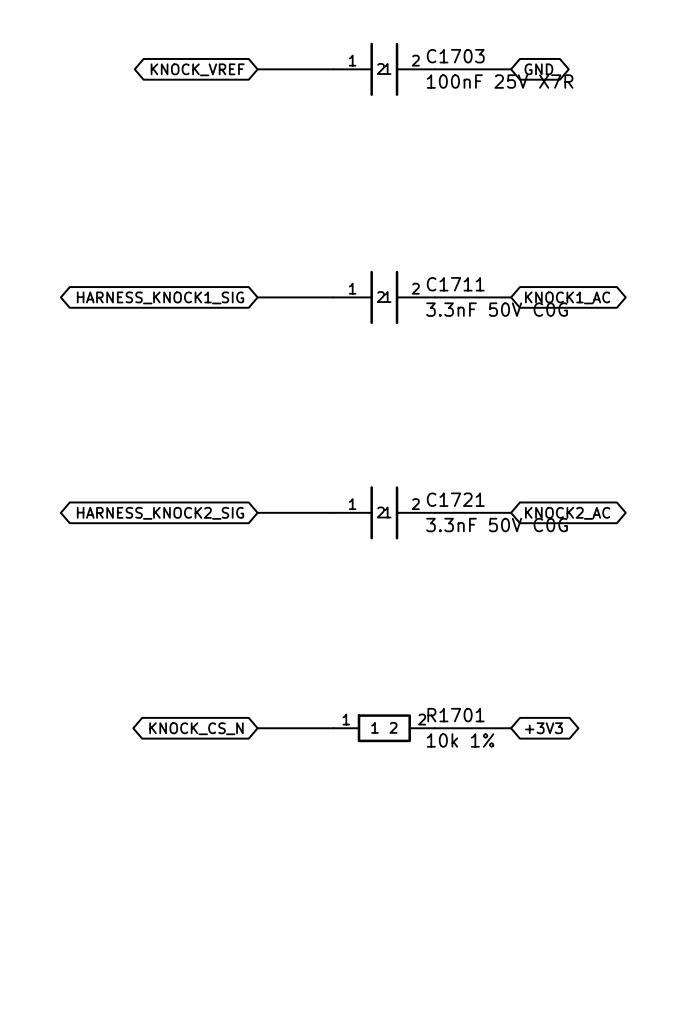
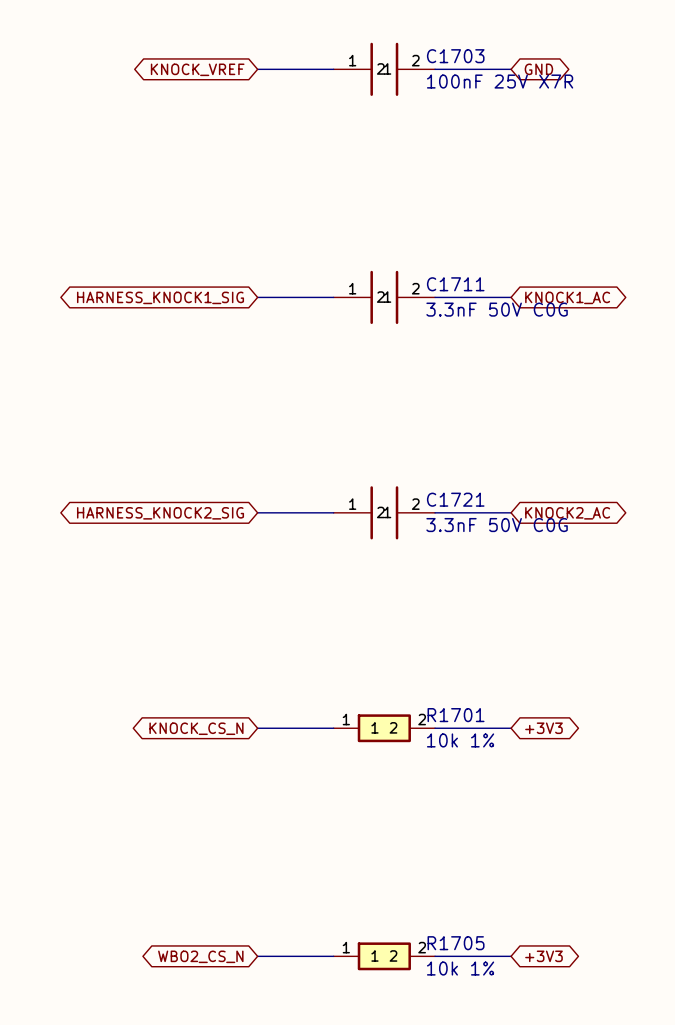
global label: none -> WBO2_CS_N (200, 956)
wire: none -> (257, 956) (333, 956)
R1705: none -> 10k 1% (384, 956)
wire: none -> (435, 956) (511, 956)
global label: none -> +3V3 (543, 956)

